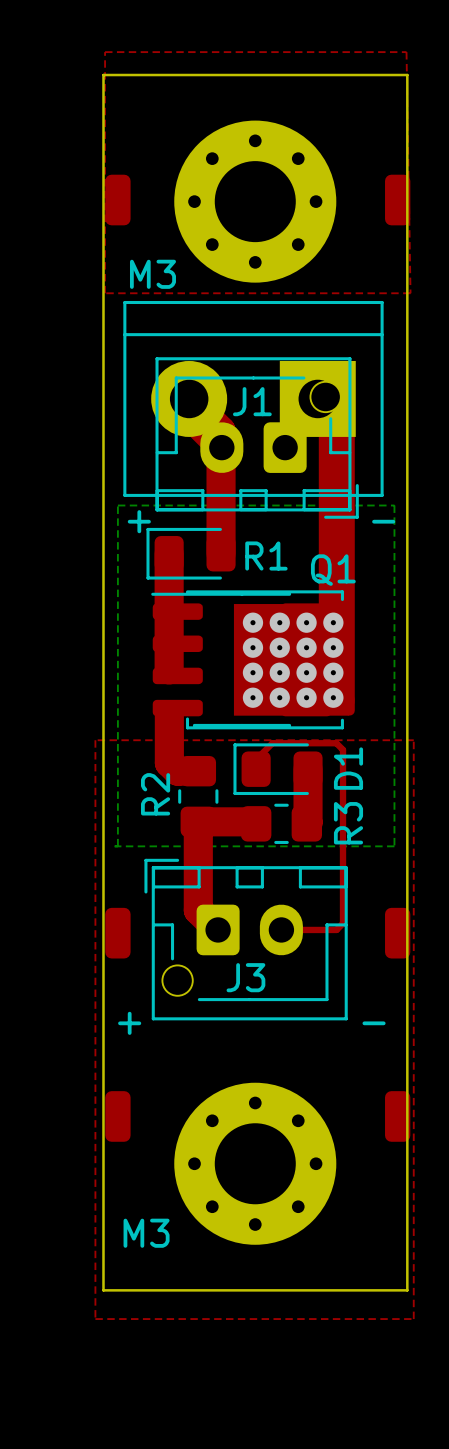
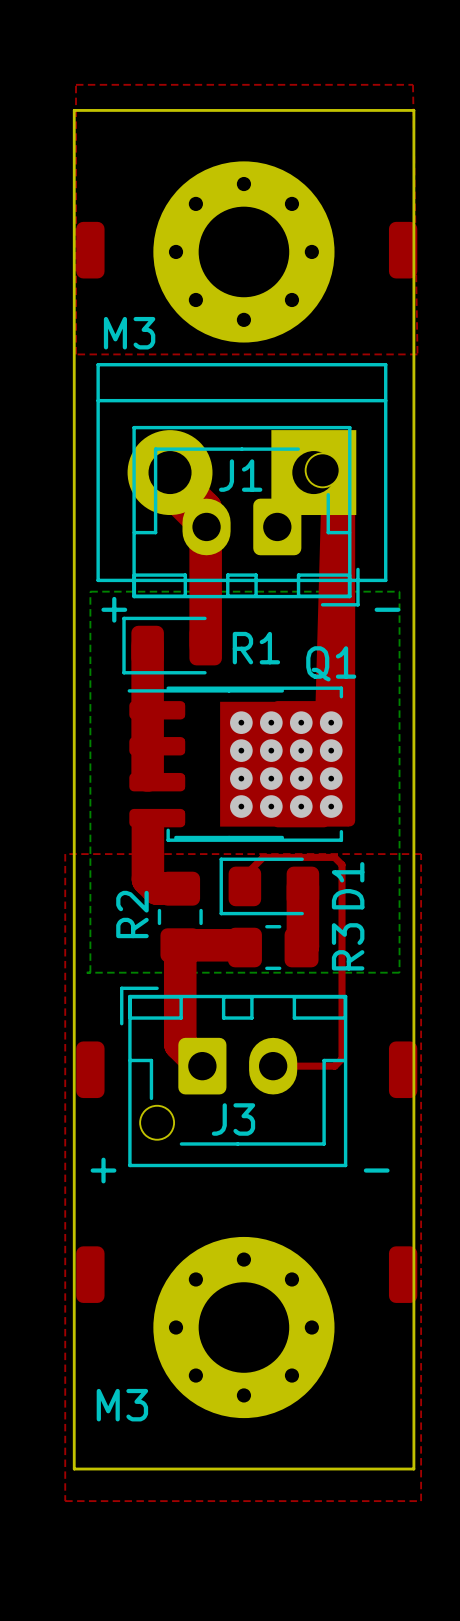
top track: (333, 434) (333, 624) -> (338, 455) (331, 724)

